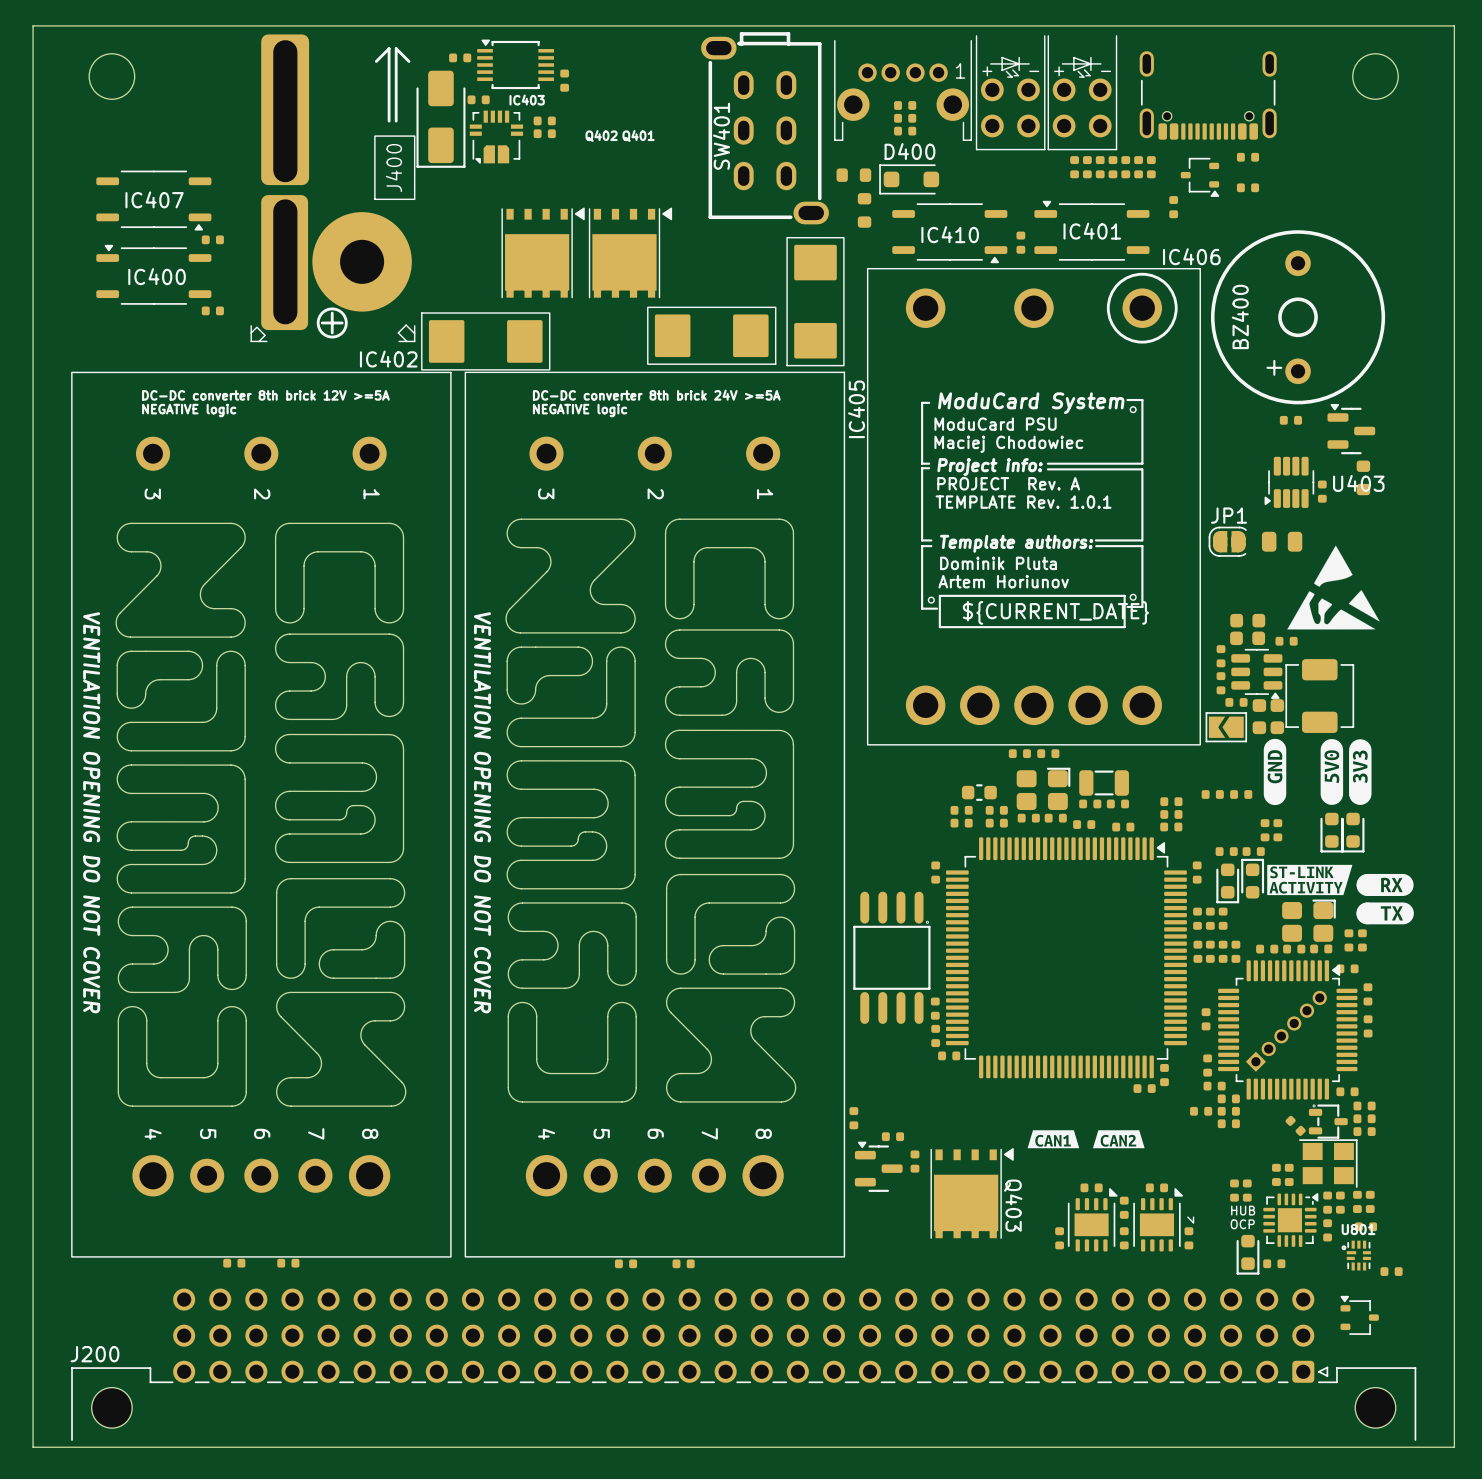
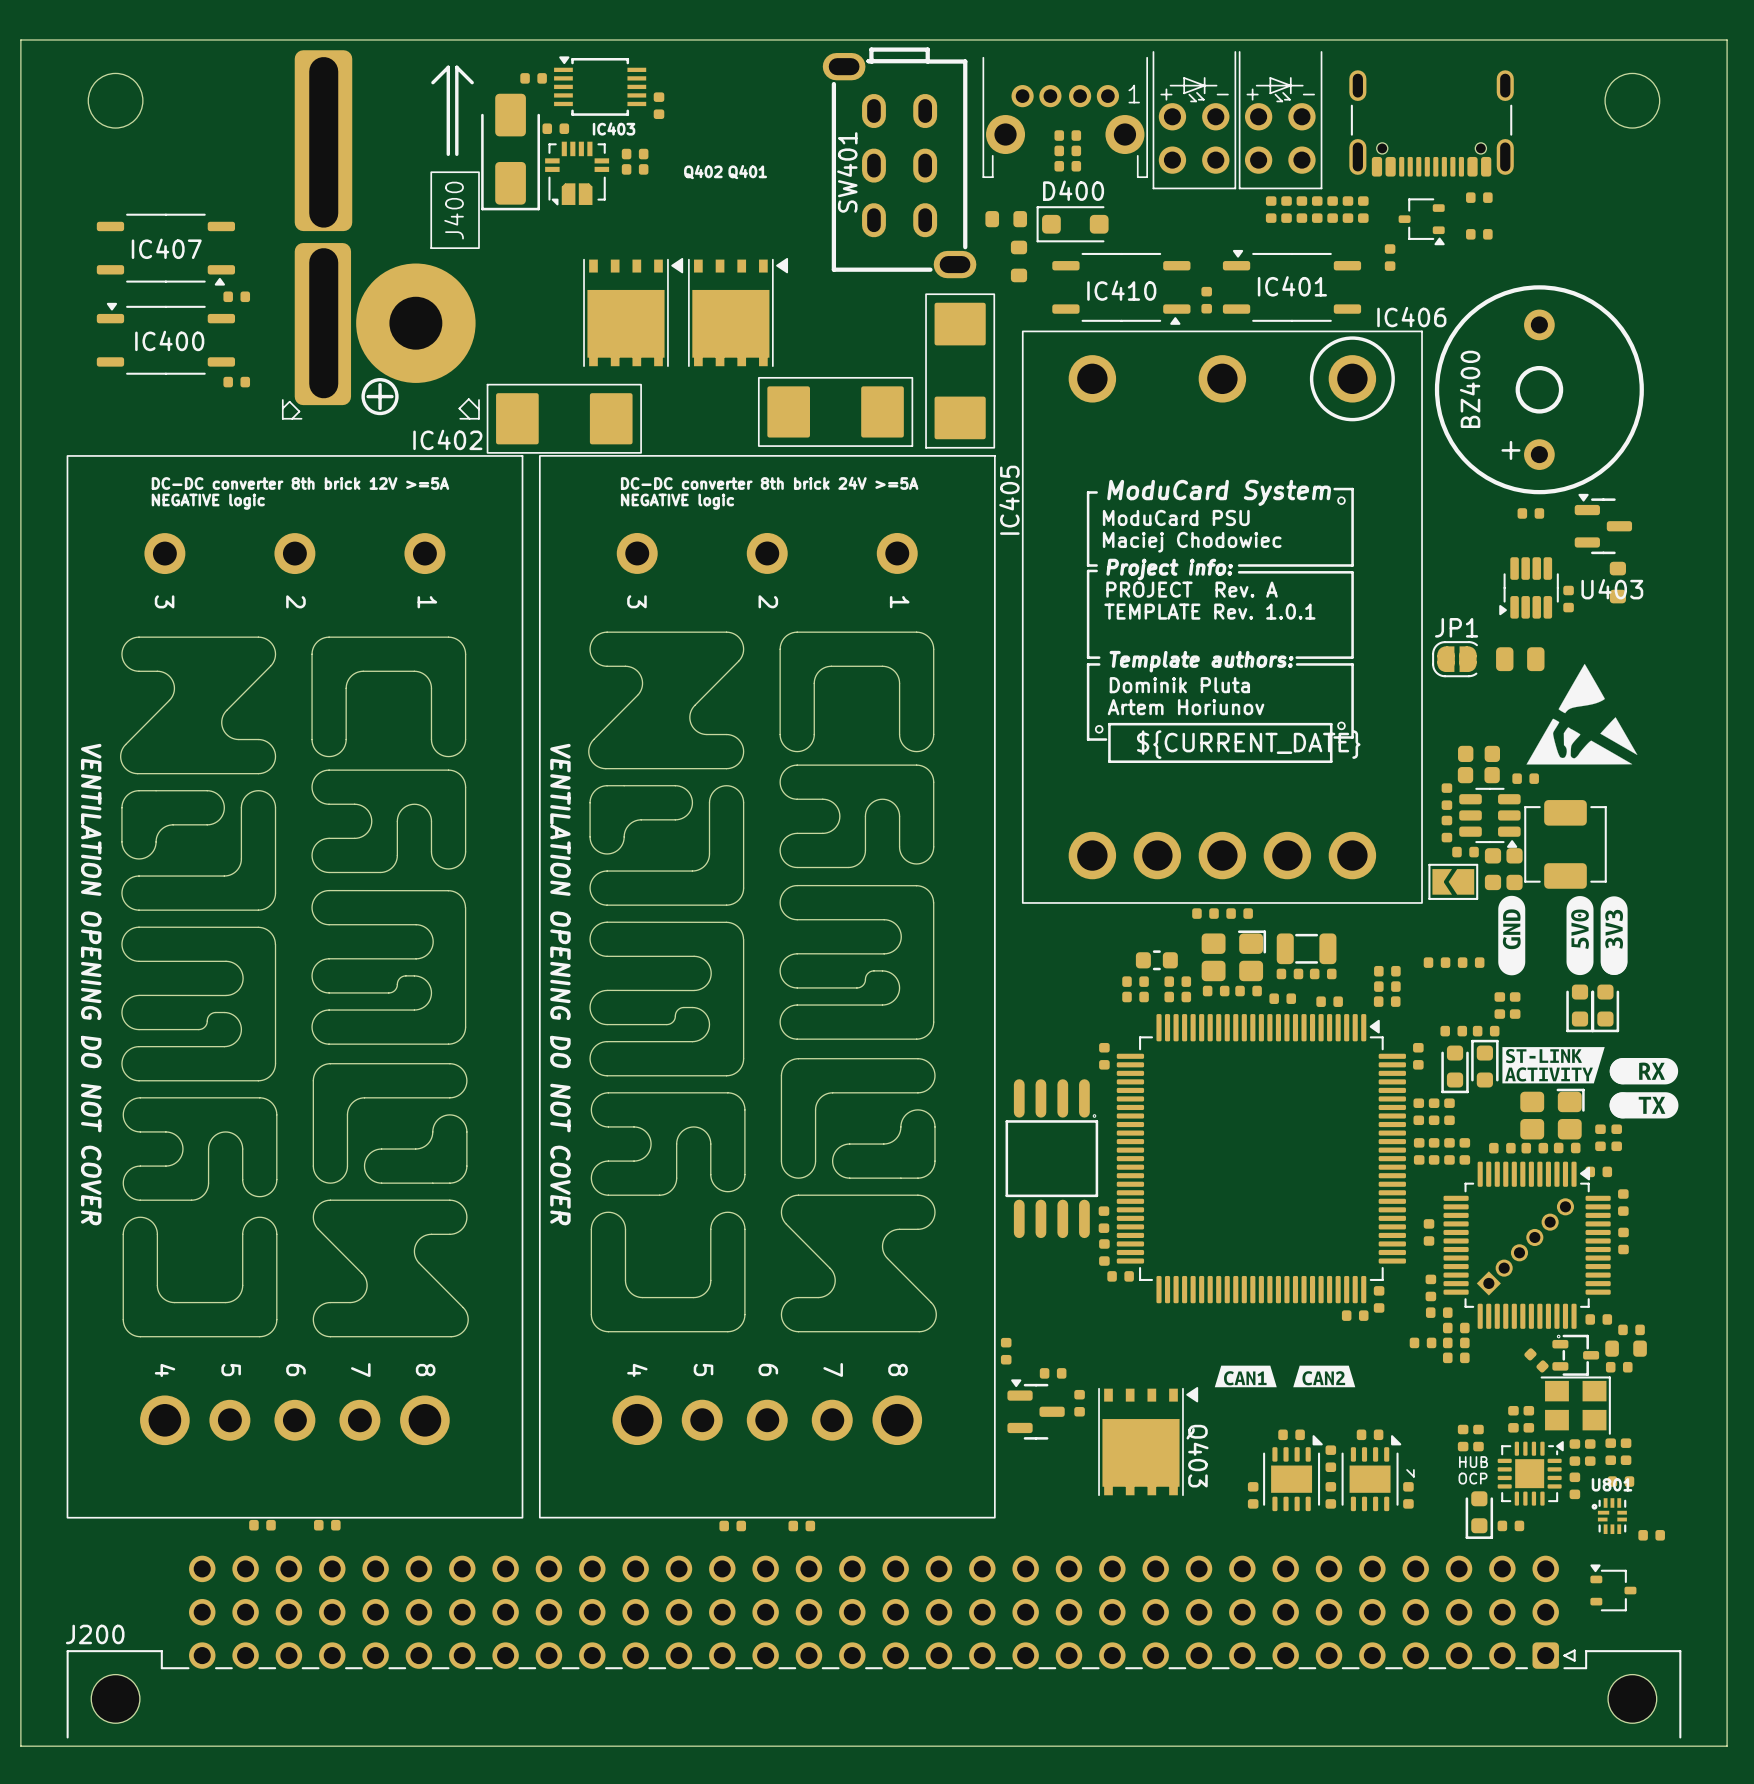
part: none -> (1631, 1329)
part: (1364, 1105) -> none
part: none -> (1626, 1348)
part: (1364, 1118) -> none

